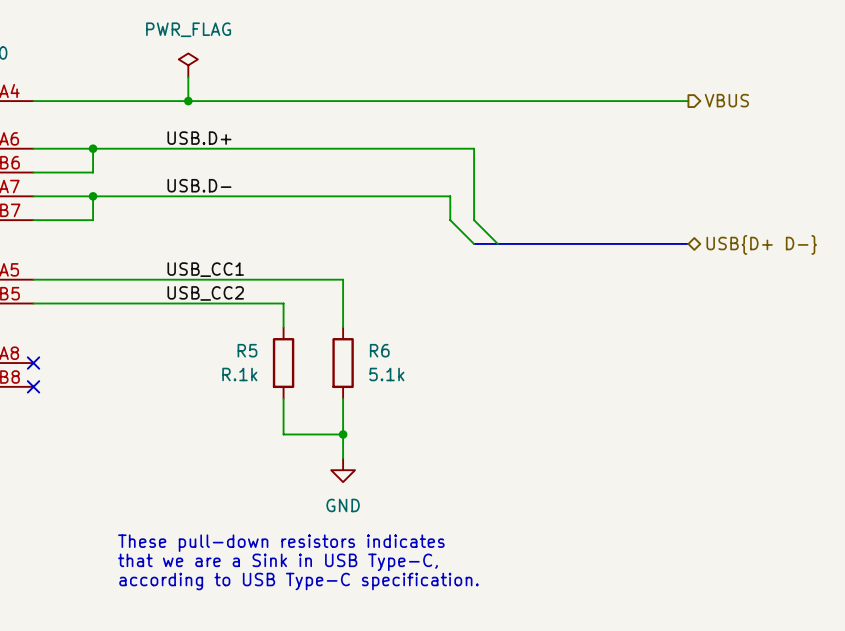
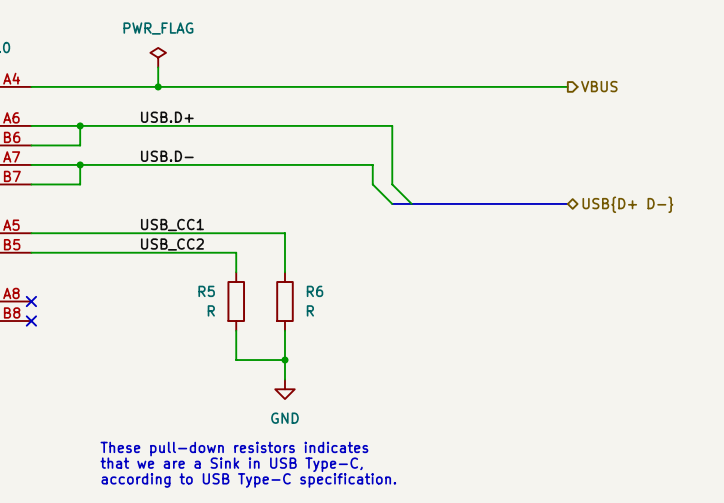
R5 value: R.1k (239, 374) -> R (211, 310)
R6 value: 5.1k (386, 374) -> R (310, 310)

